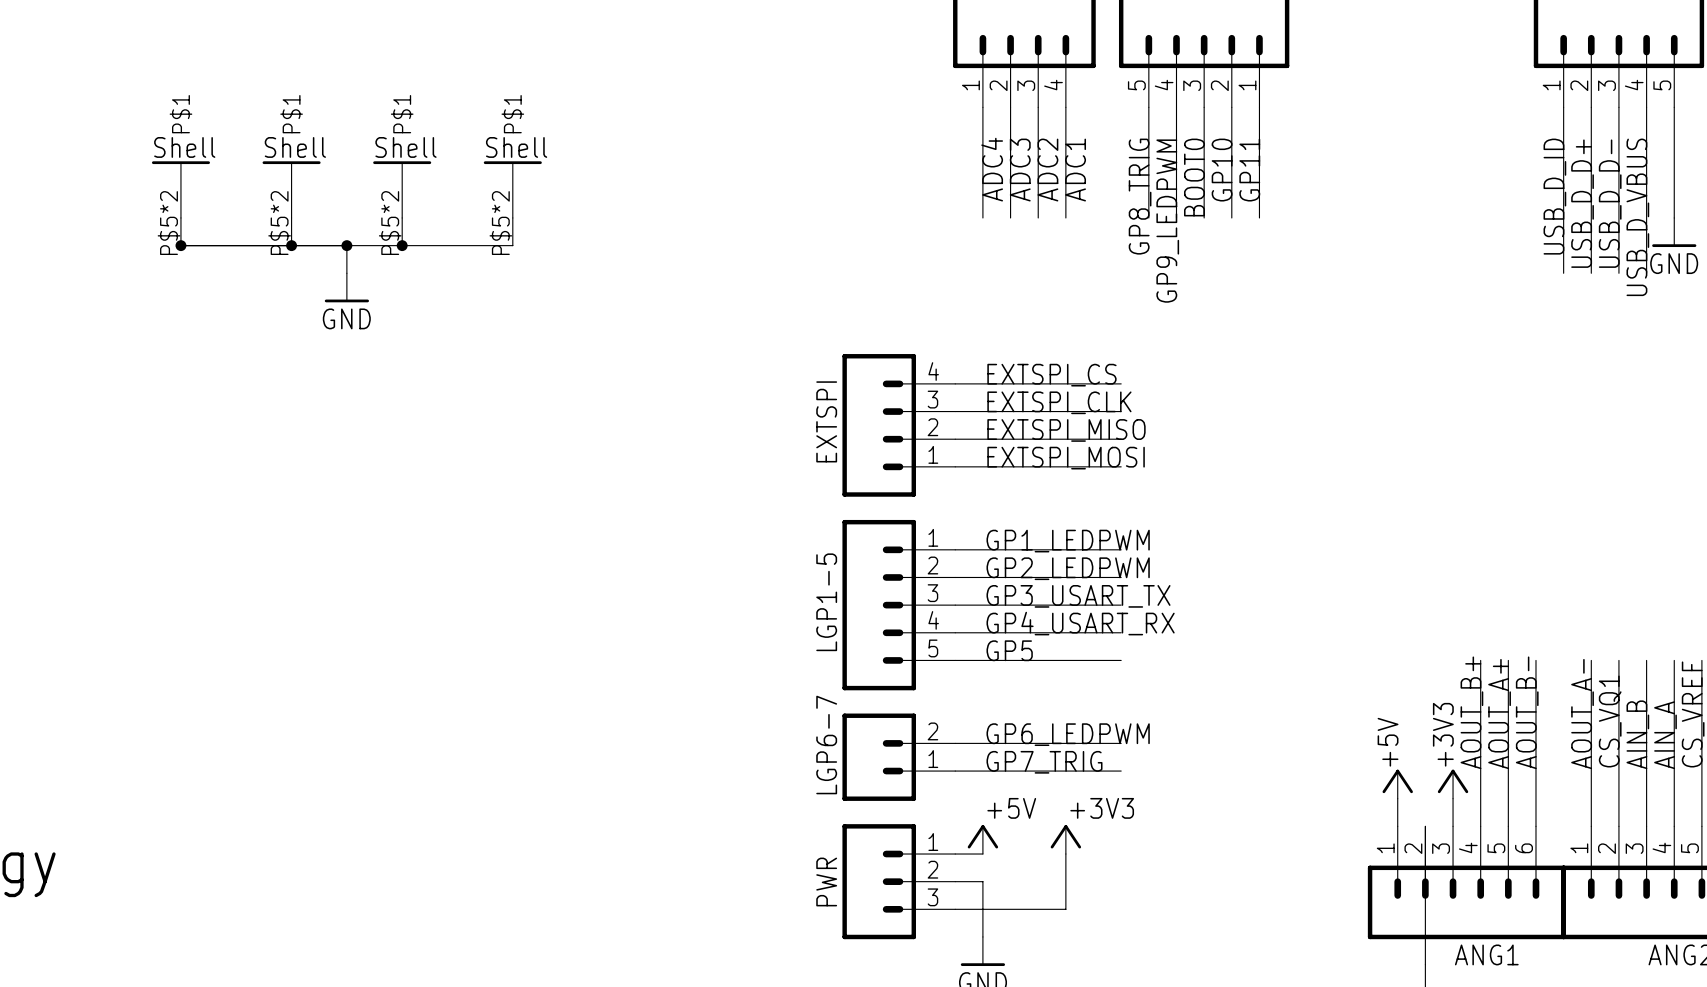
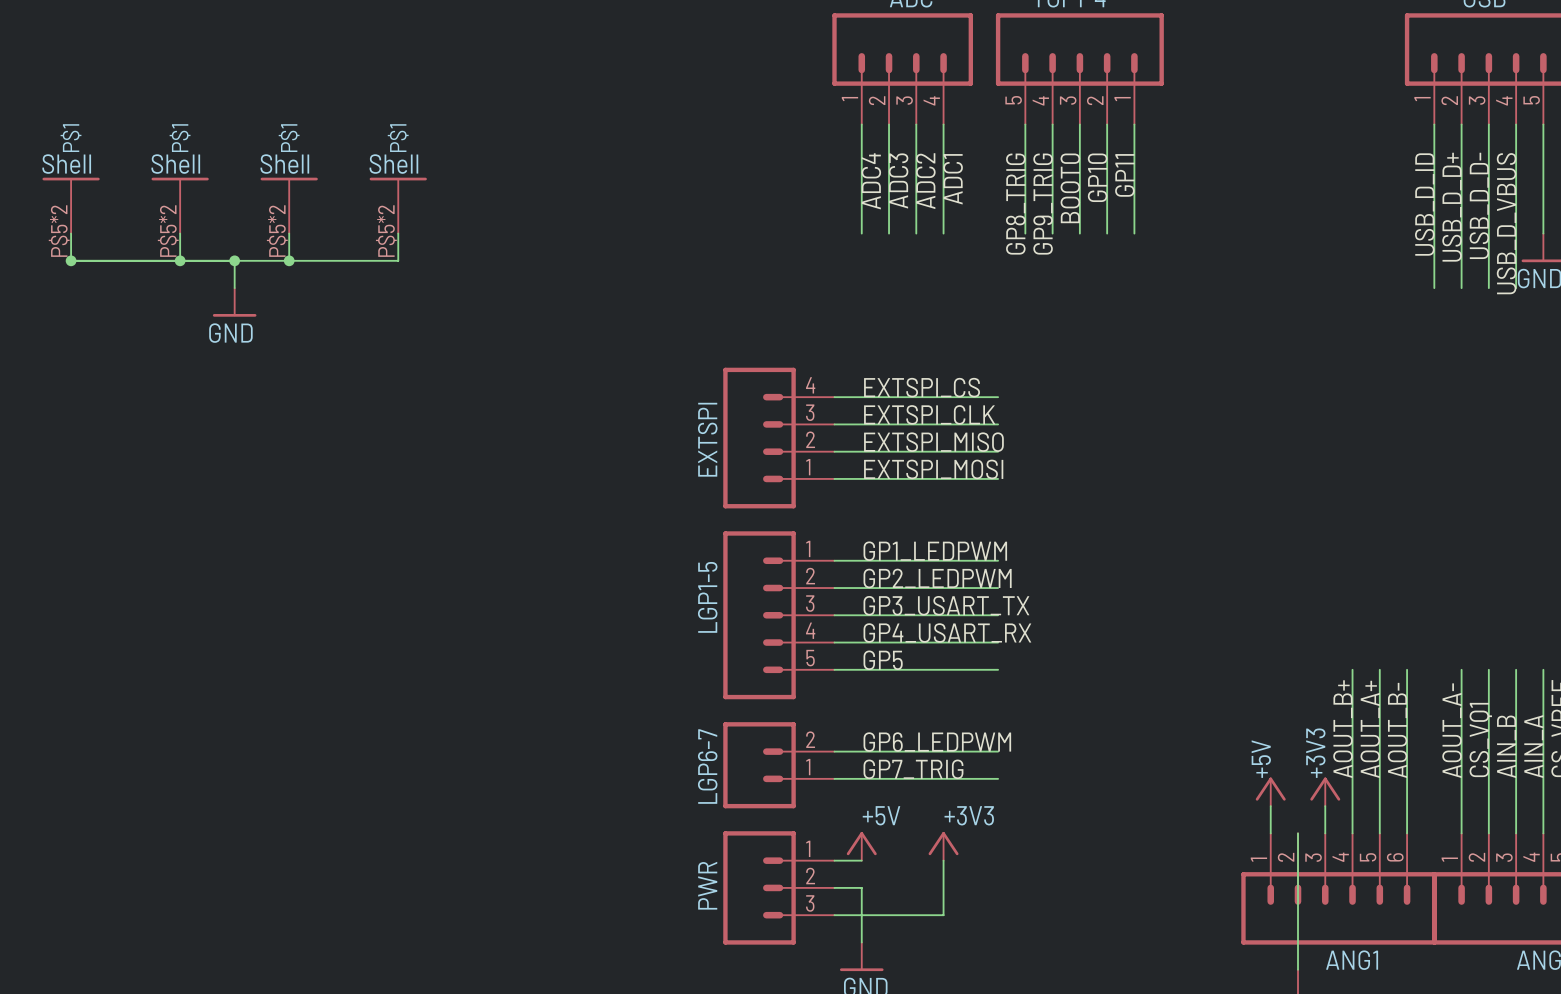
label: GP9_LEDPWM (1167, 221) -> GP9_TRIG (1043, 204)

